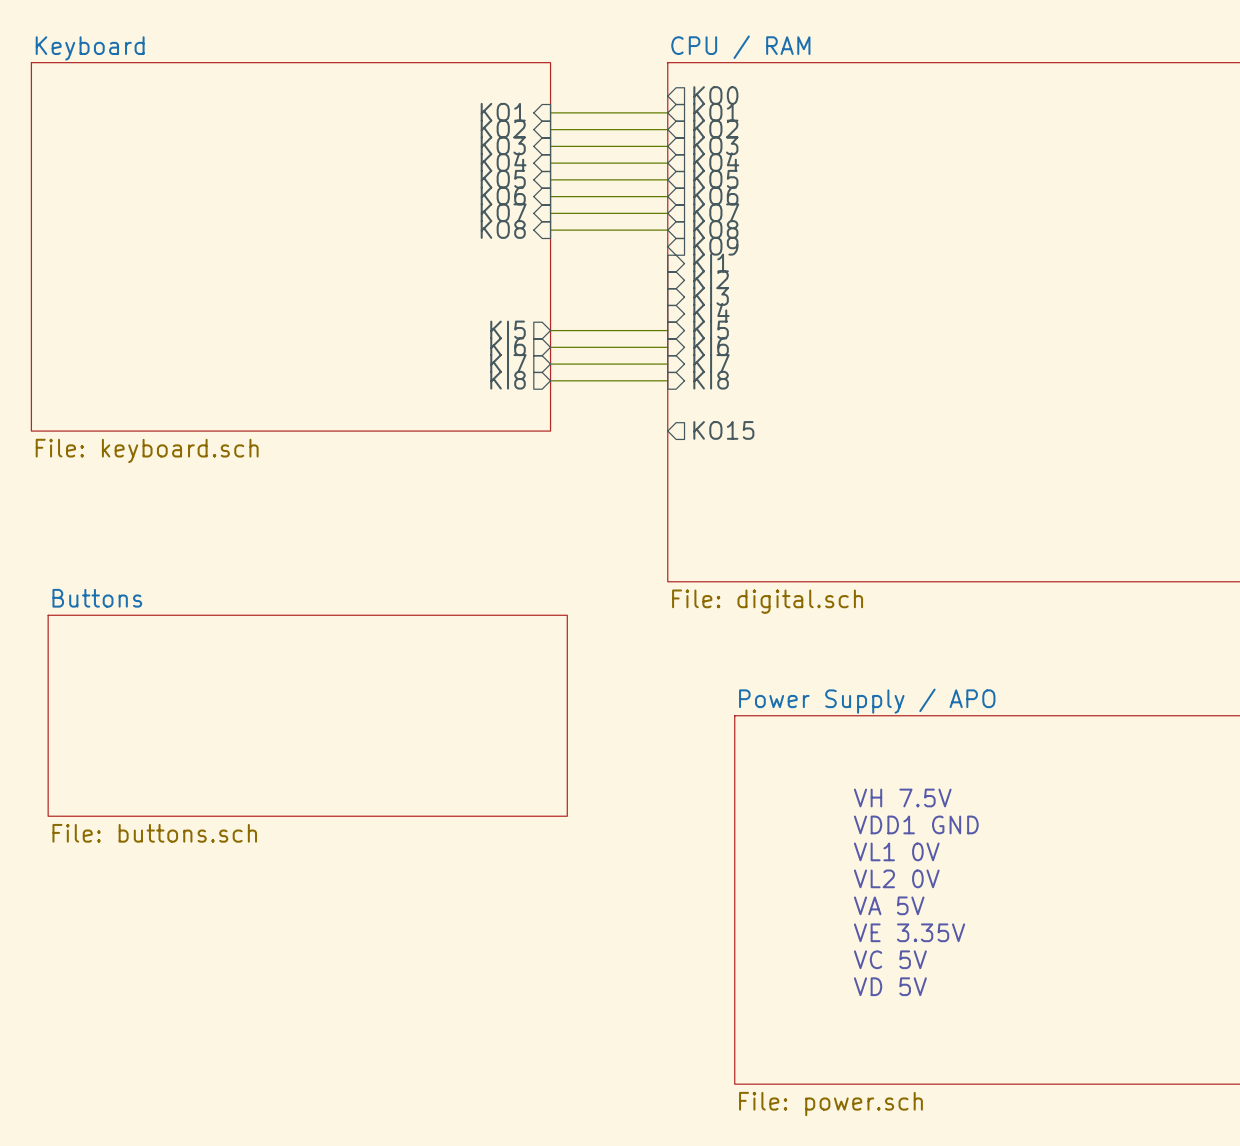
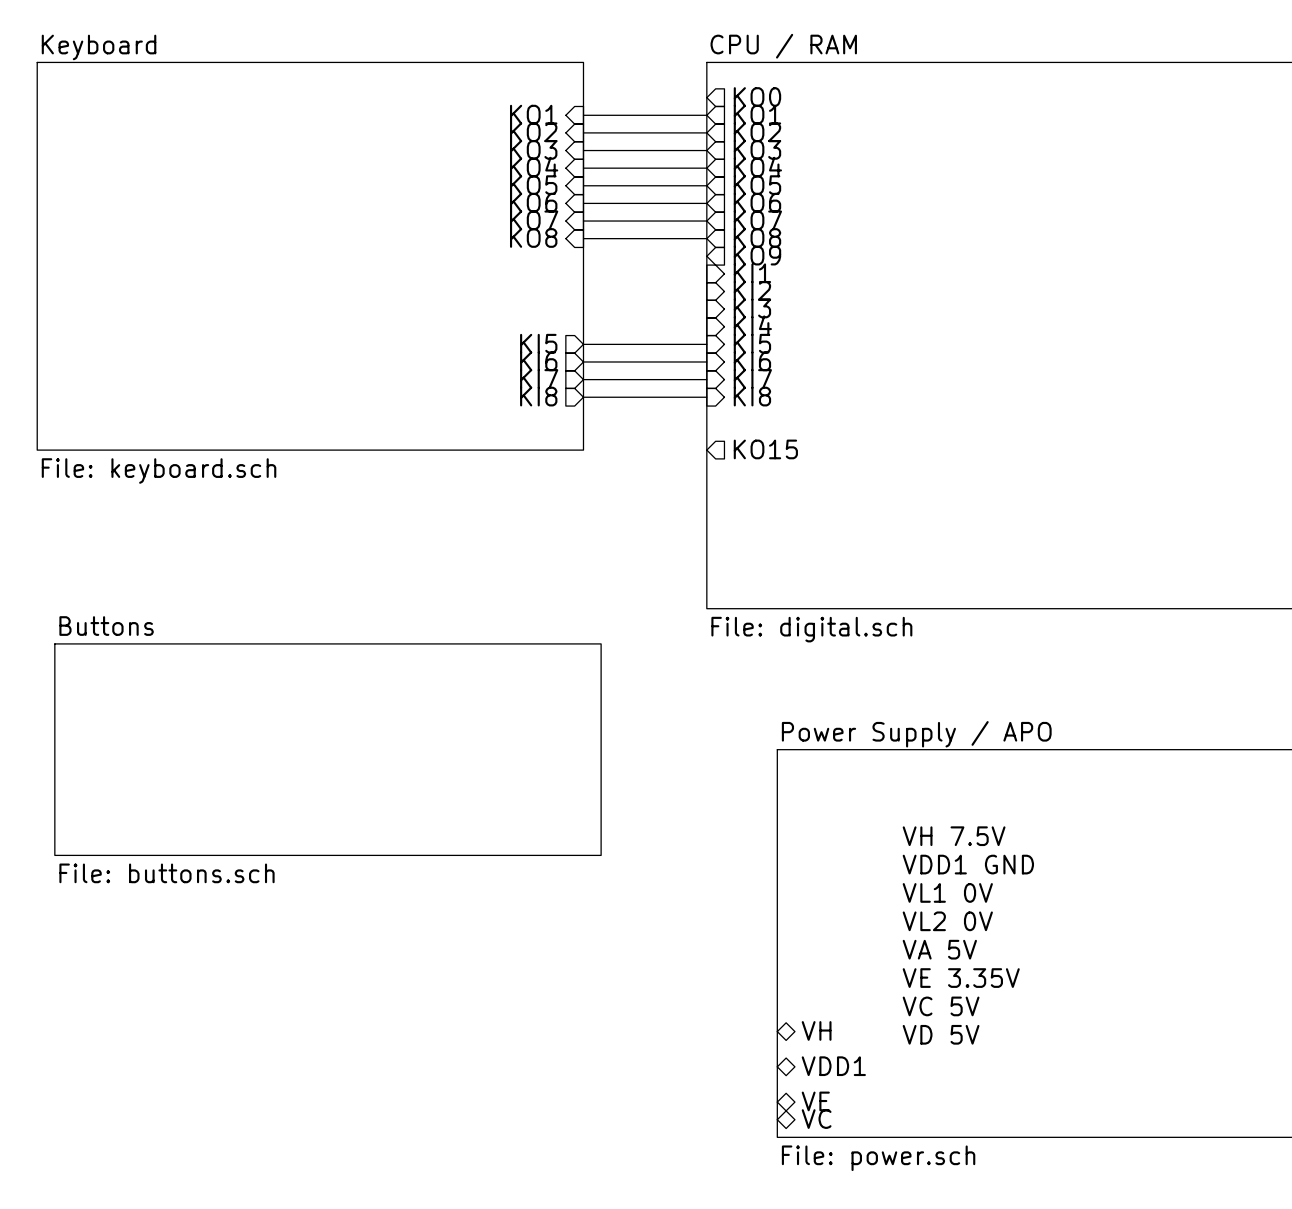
sheet pin: none -> VH (816, 1030)
sheet pin: none -> VDD1 (833, 1066)
sheet pin: none -> VE (815, 1101)
sheet pin: none -> VC (816, 1119)

